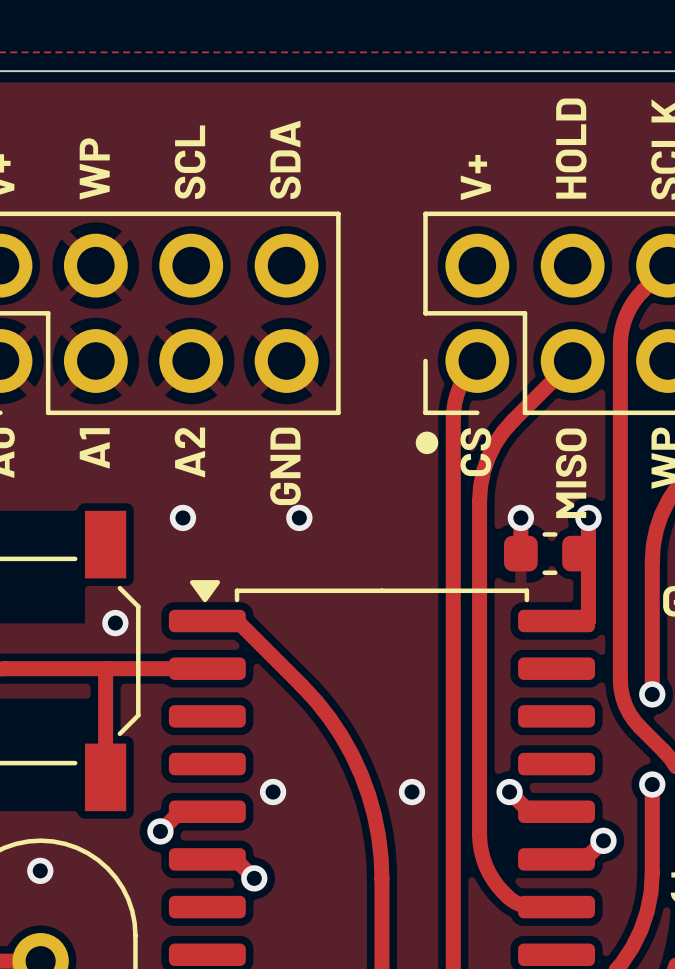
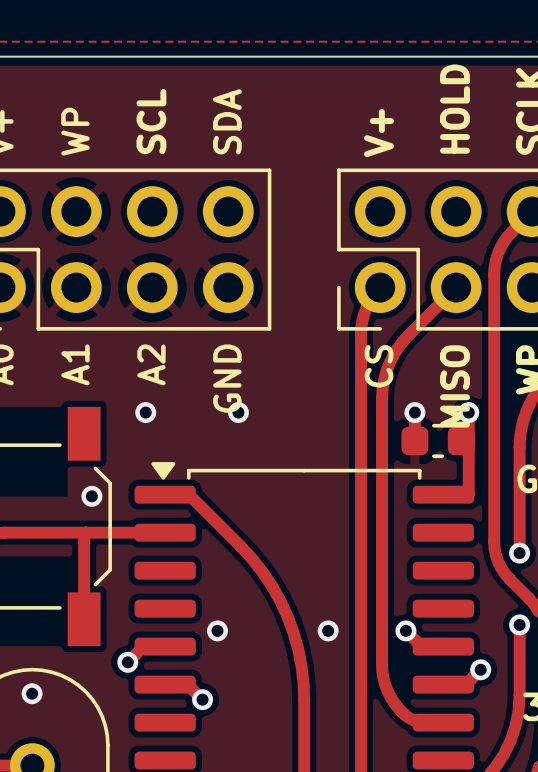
drawing: [415, 431, 439, 455] -> none

